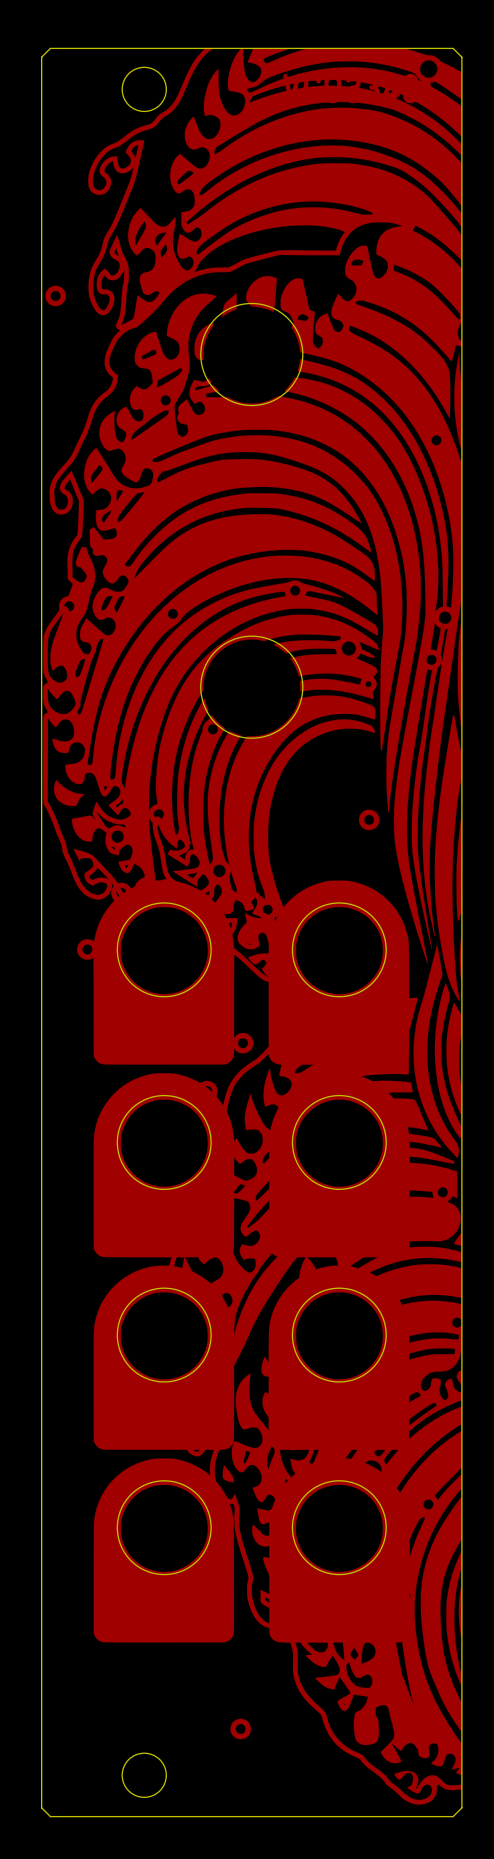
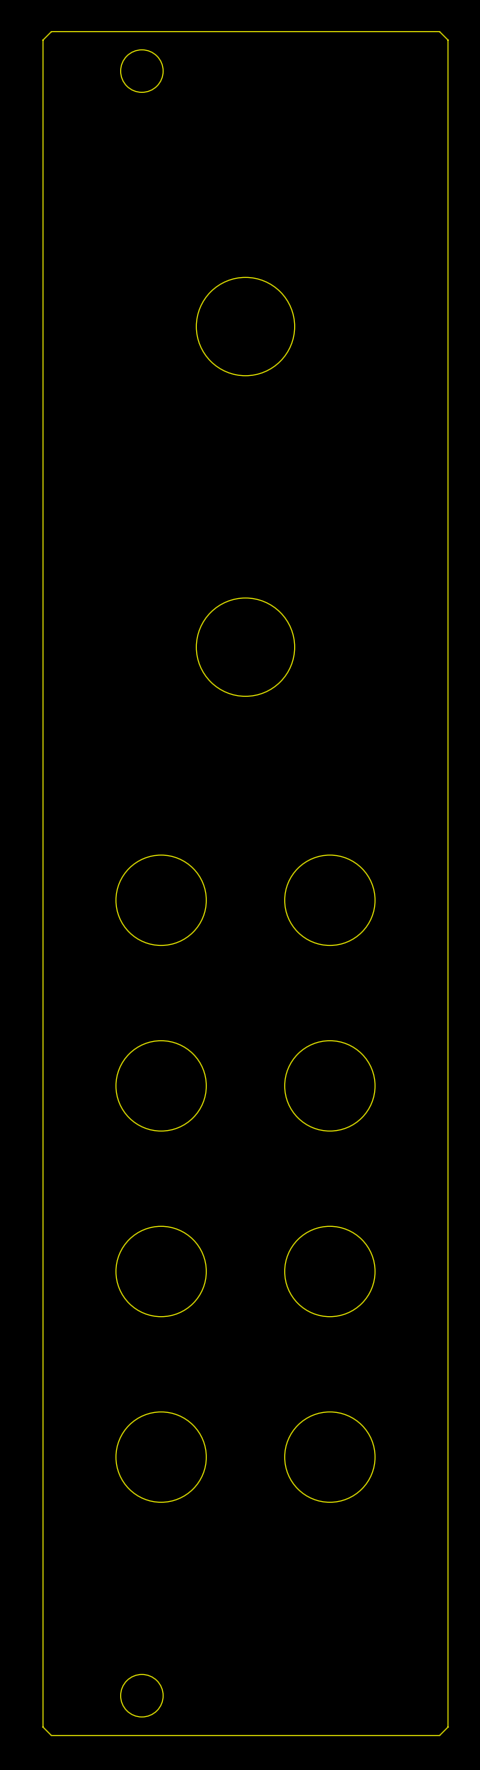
drawing: [43, 48, 462, 1805] -> none

